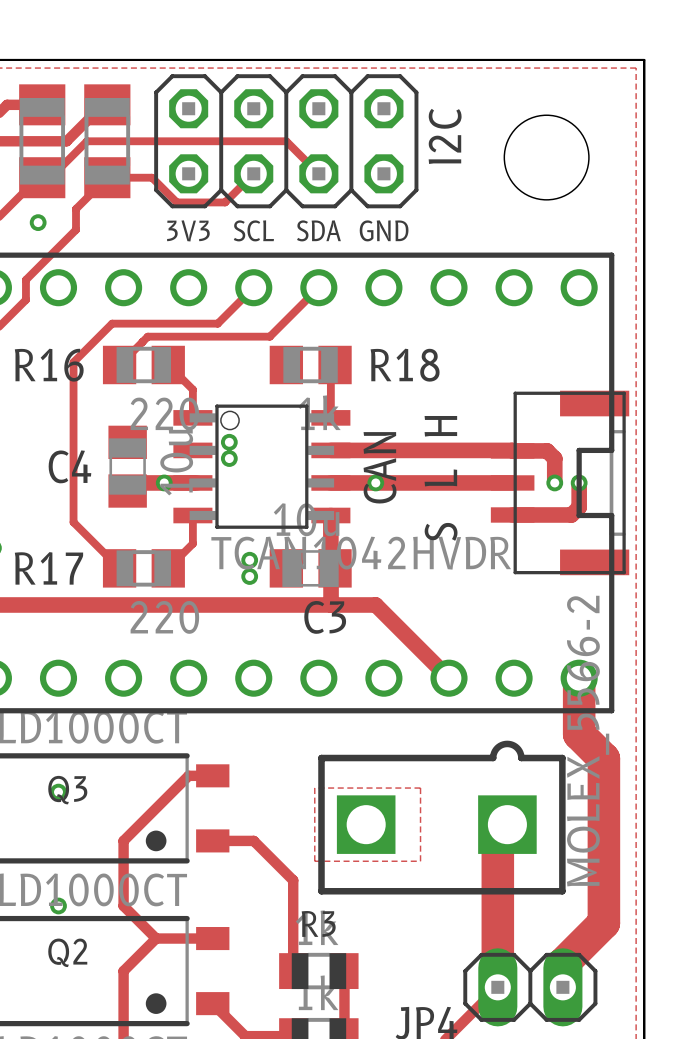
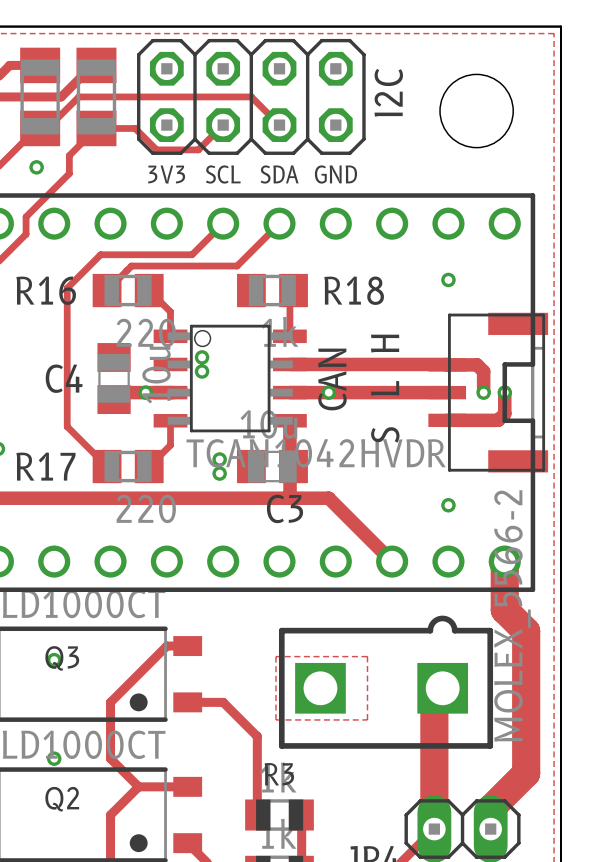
via: none -> (448, 279)
via: none -> (448, 505)

